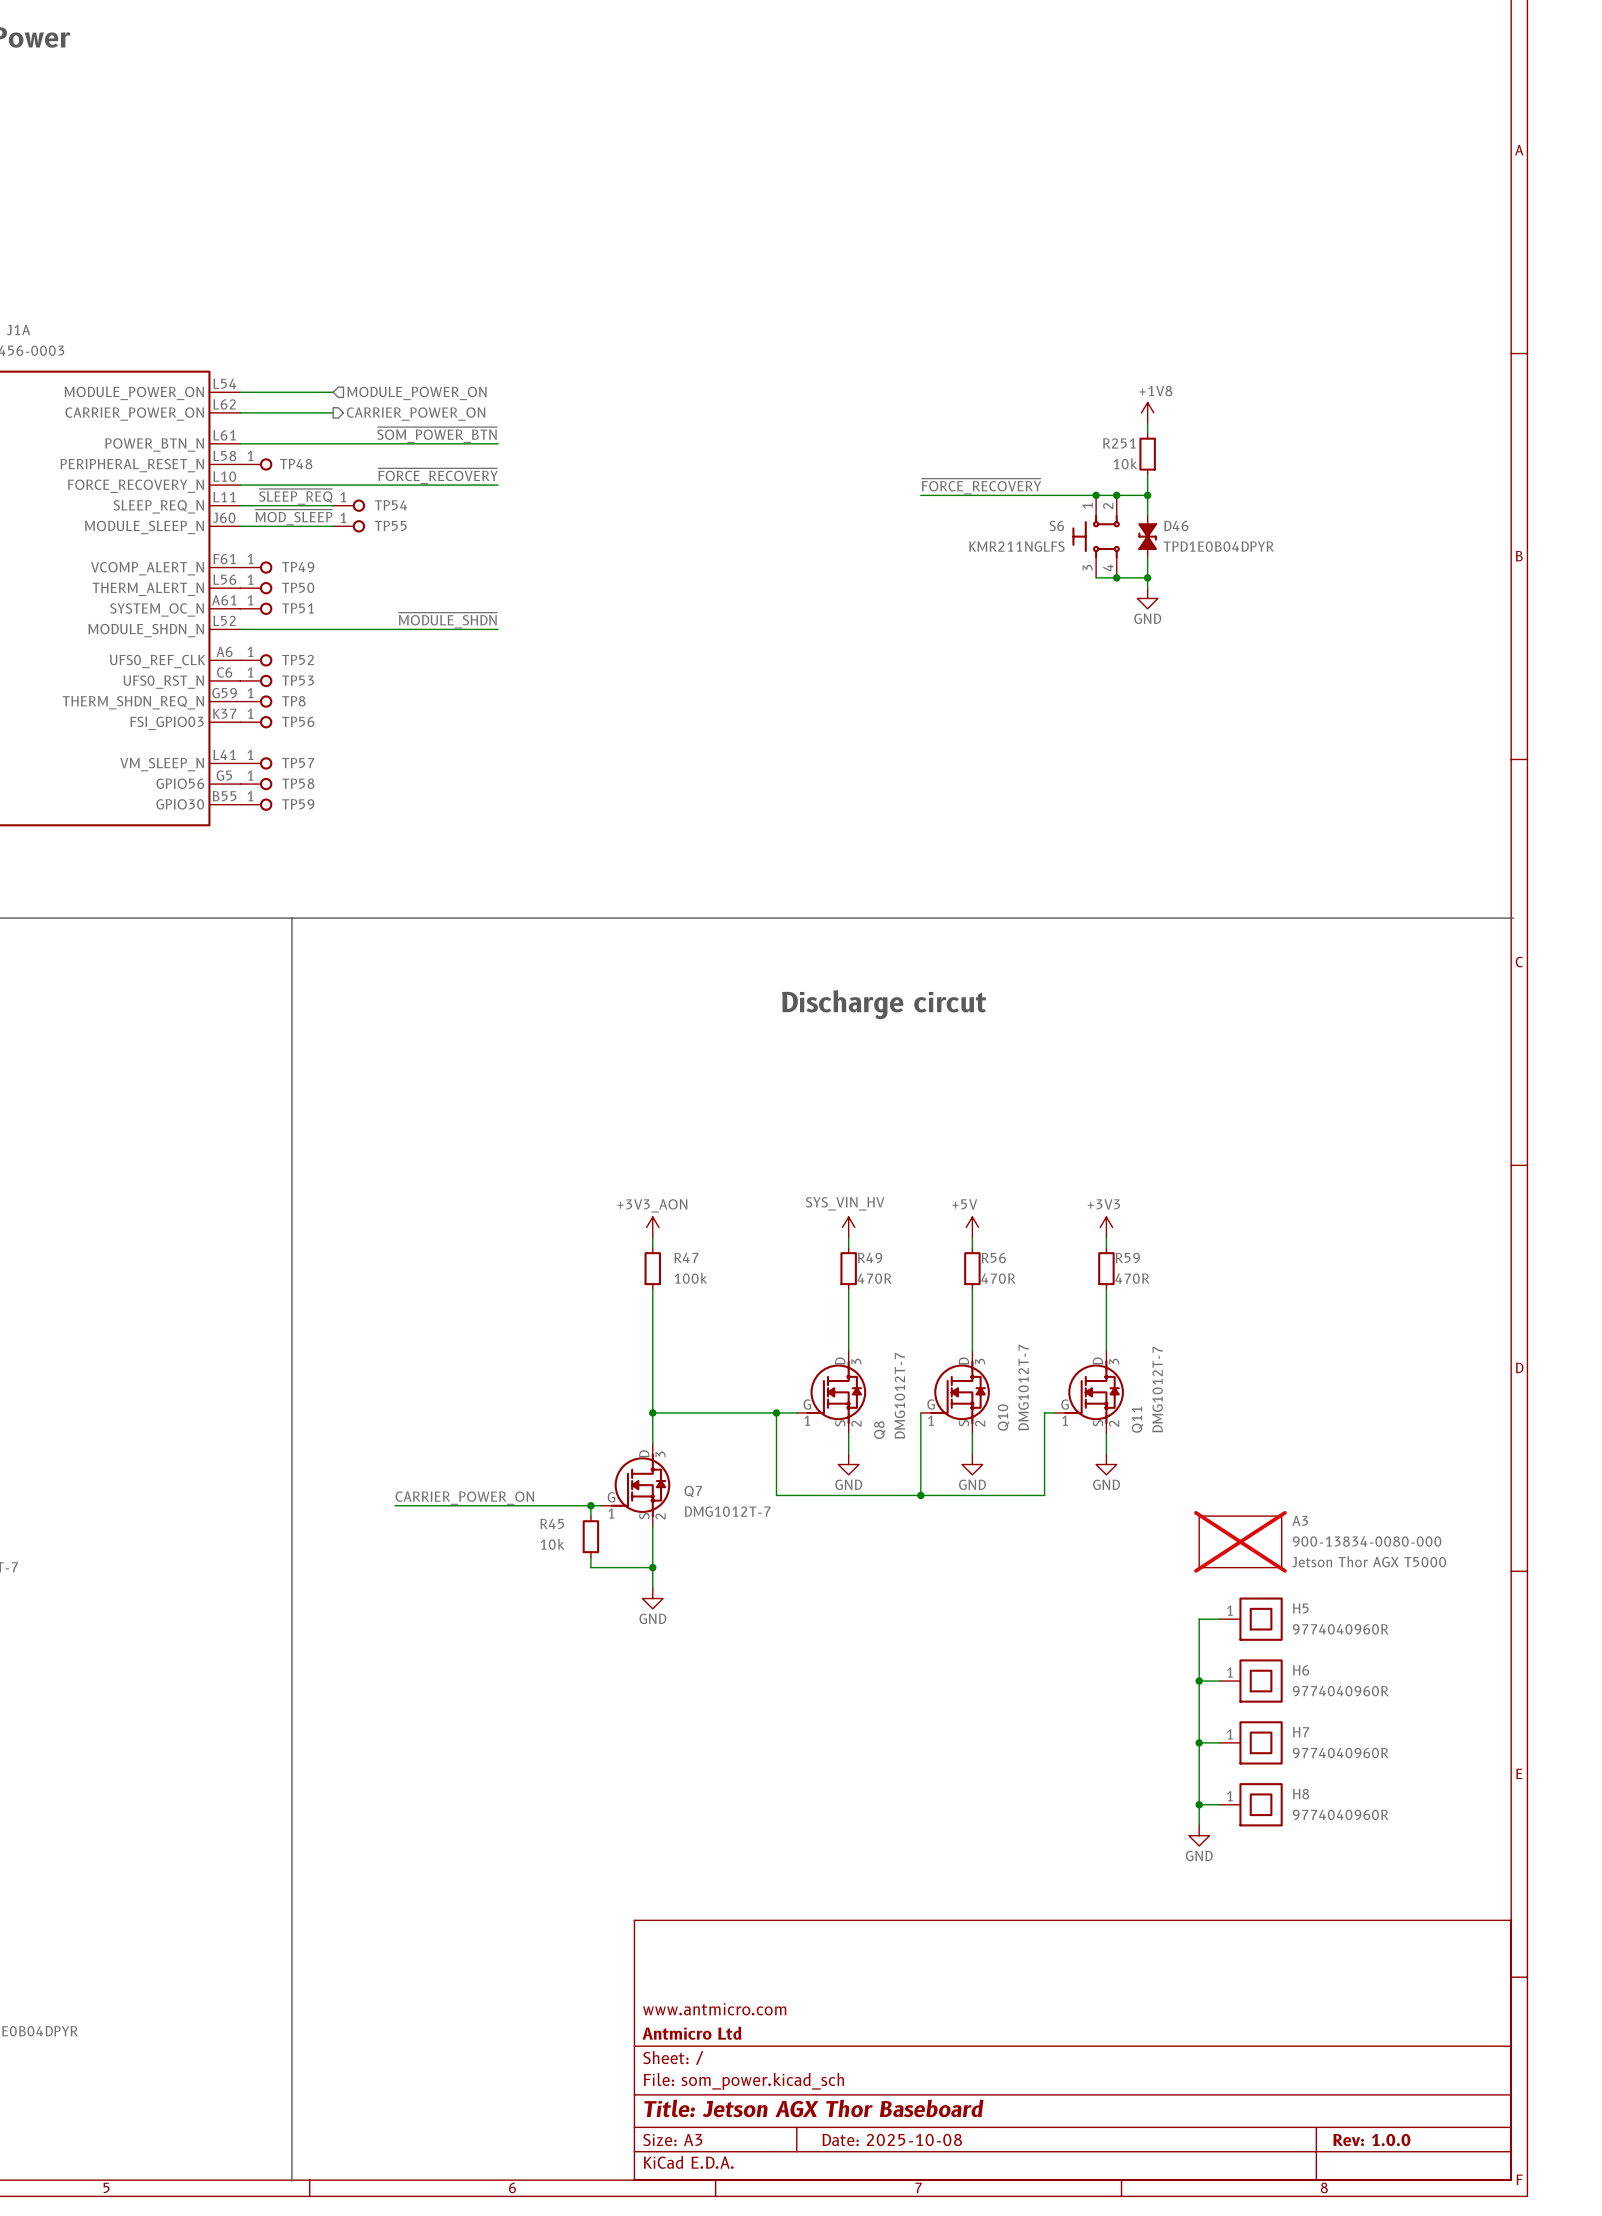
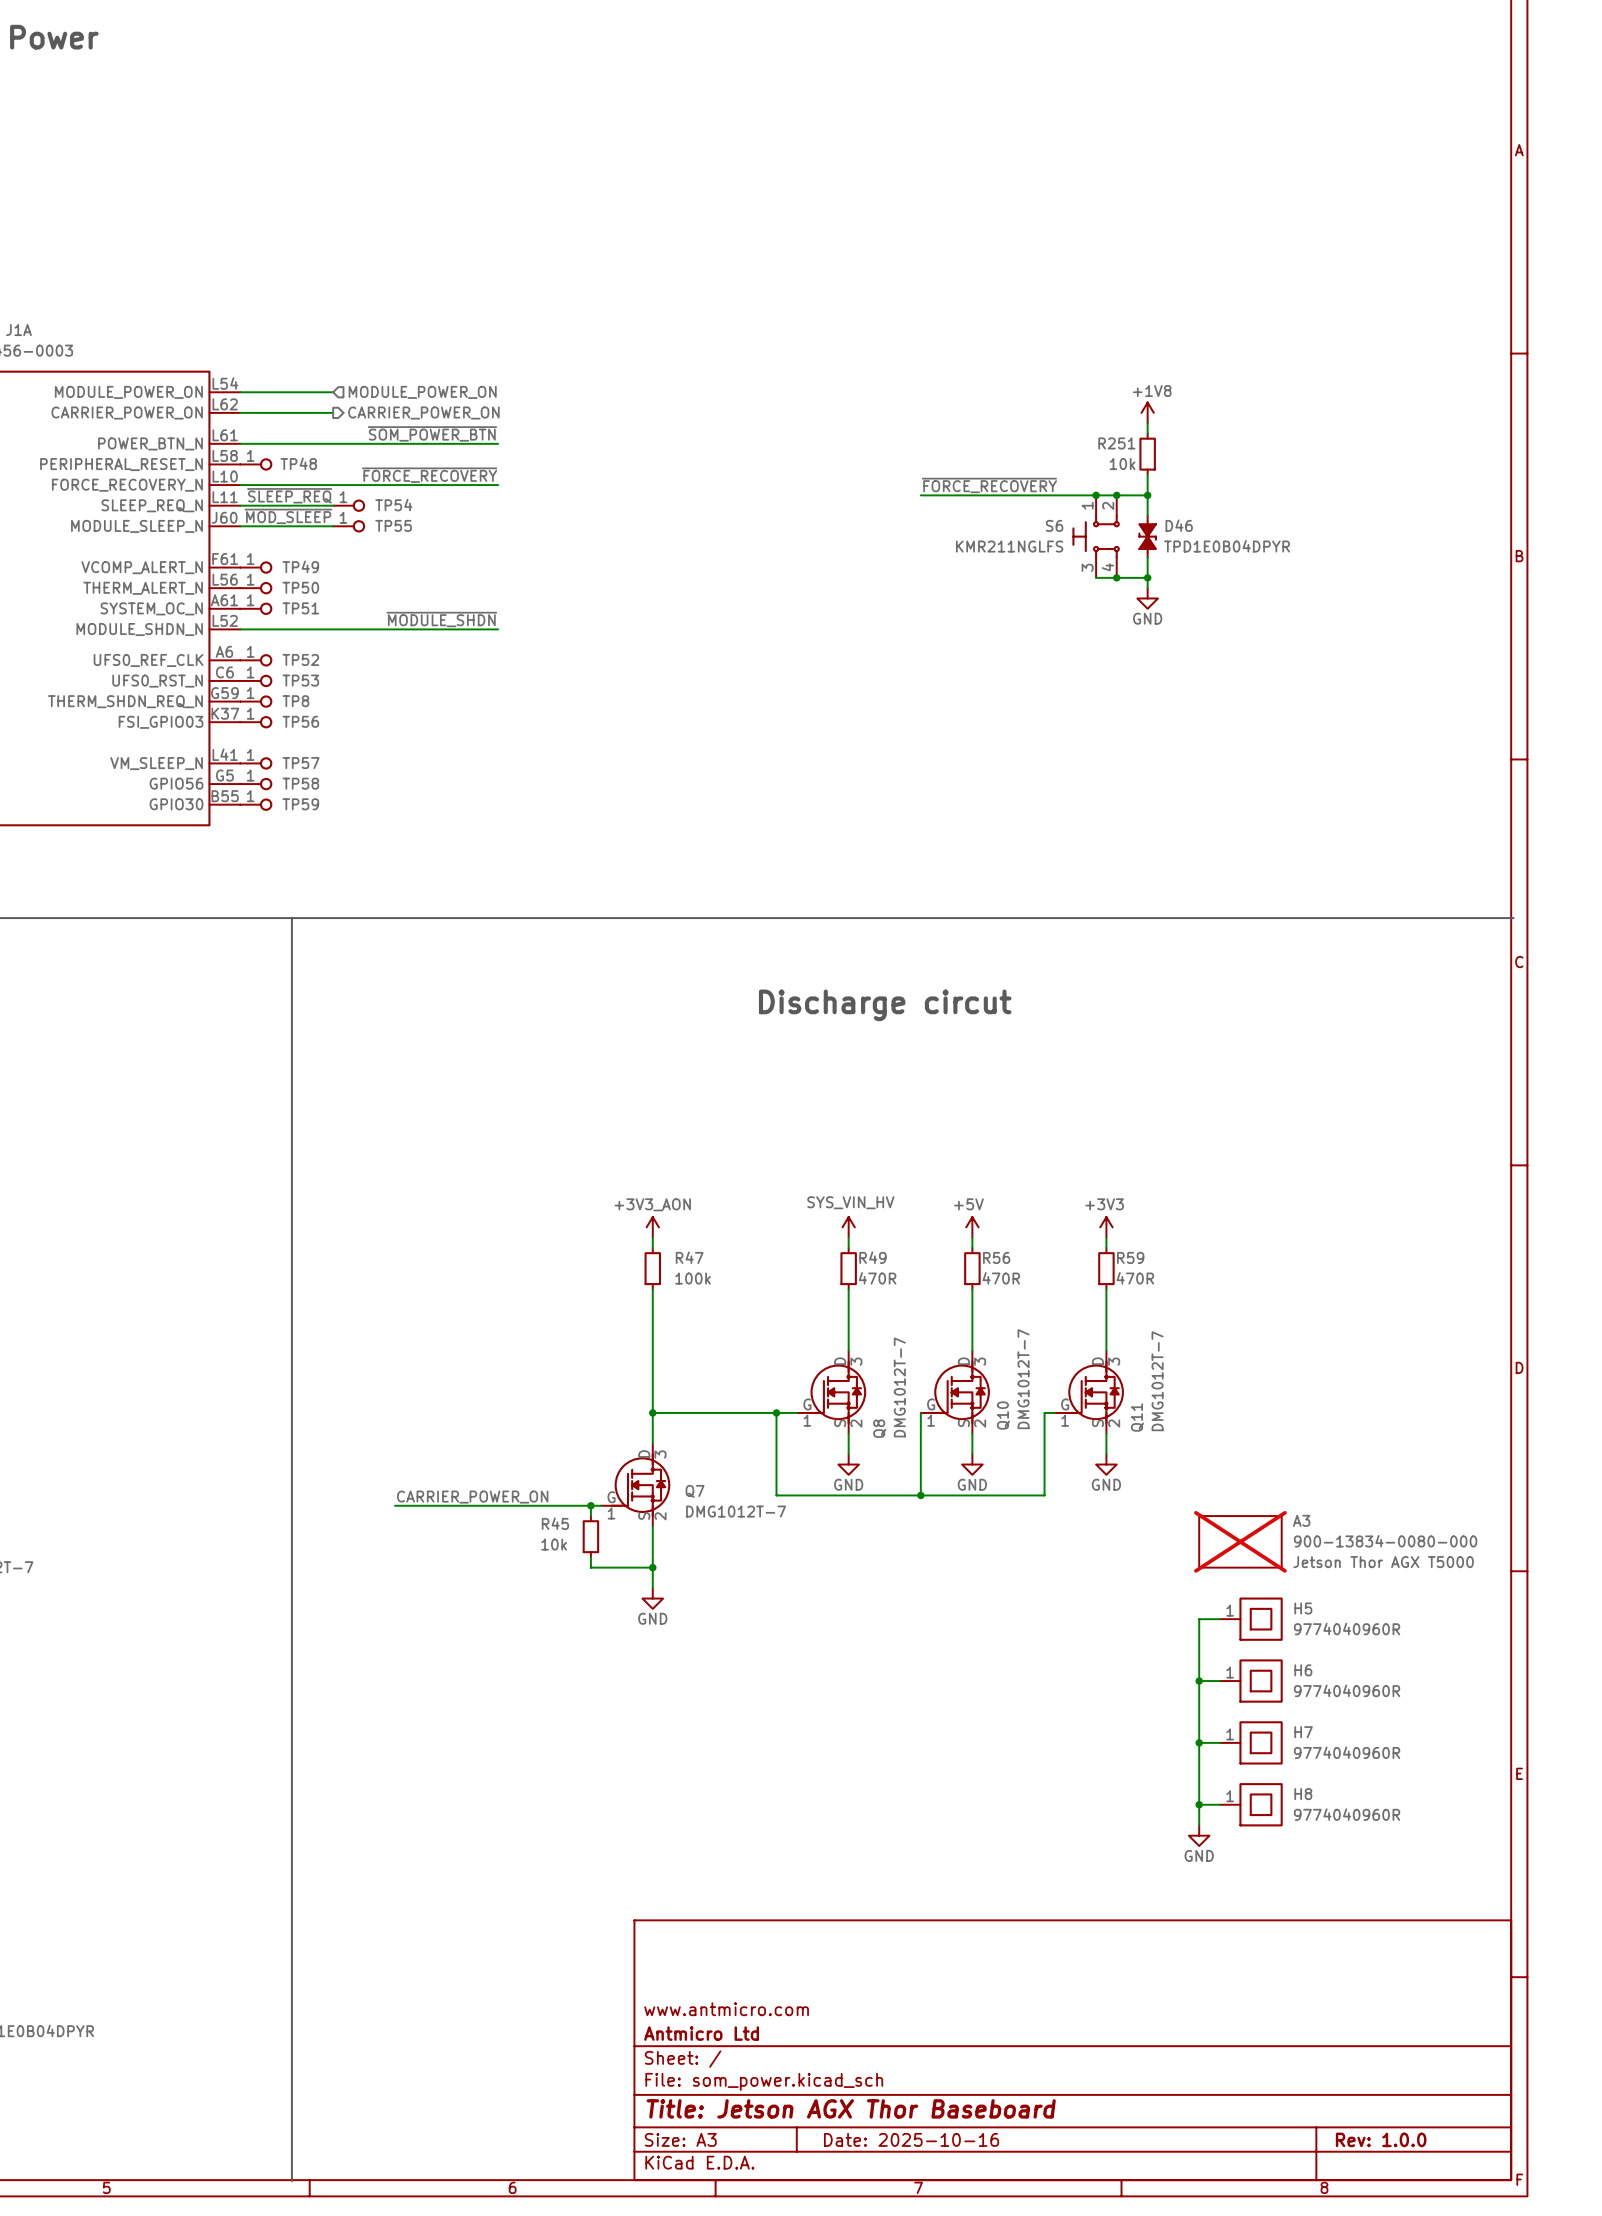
title block: Date: 2025-10-08 (892, 2139) -> Date: 2025-10-16 (911, 2139)

